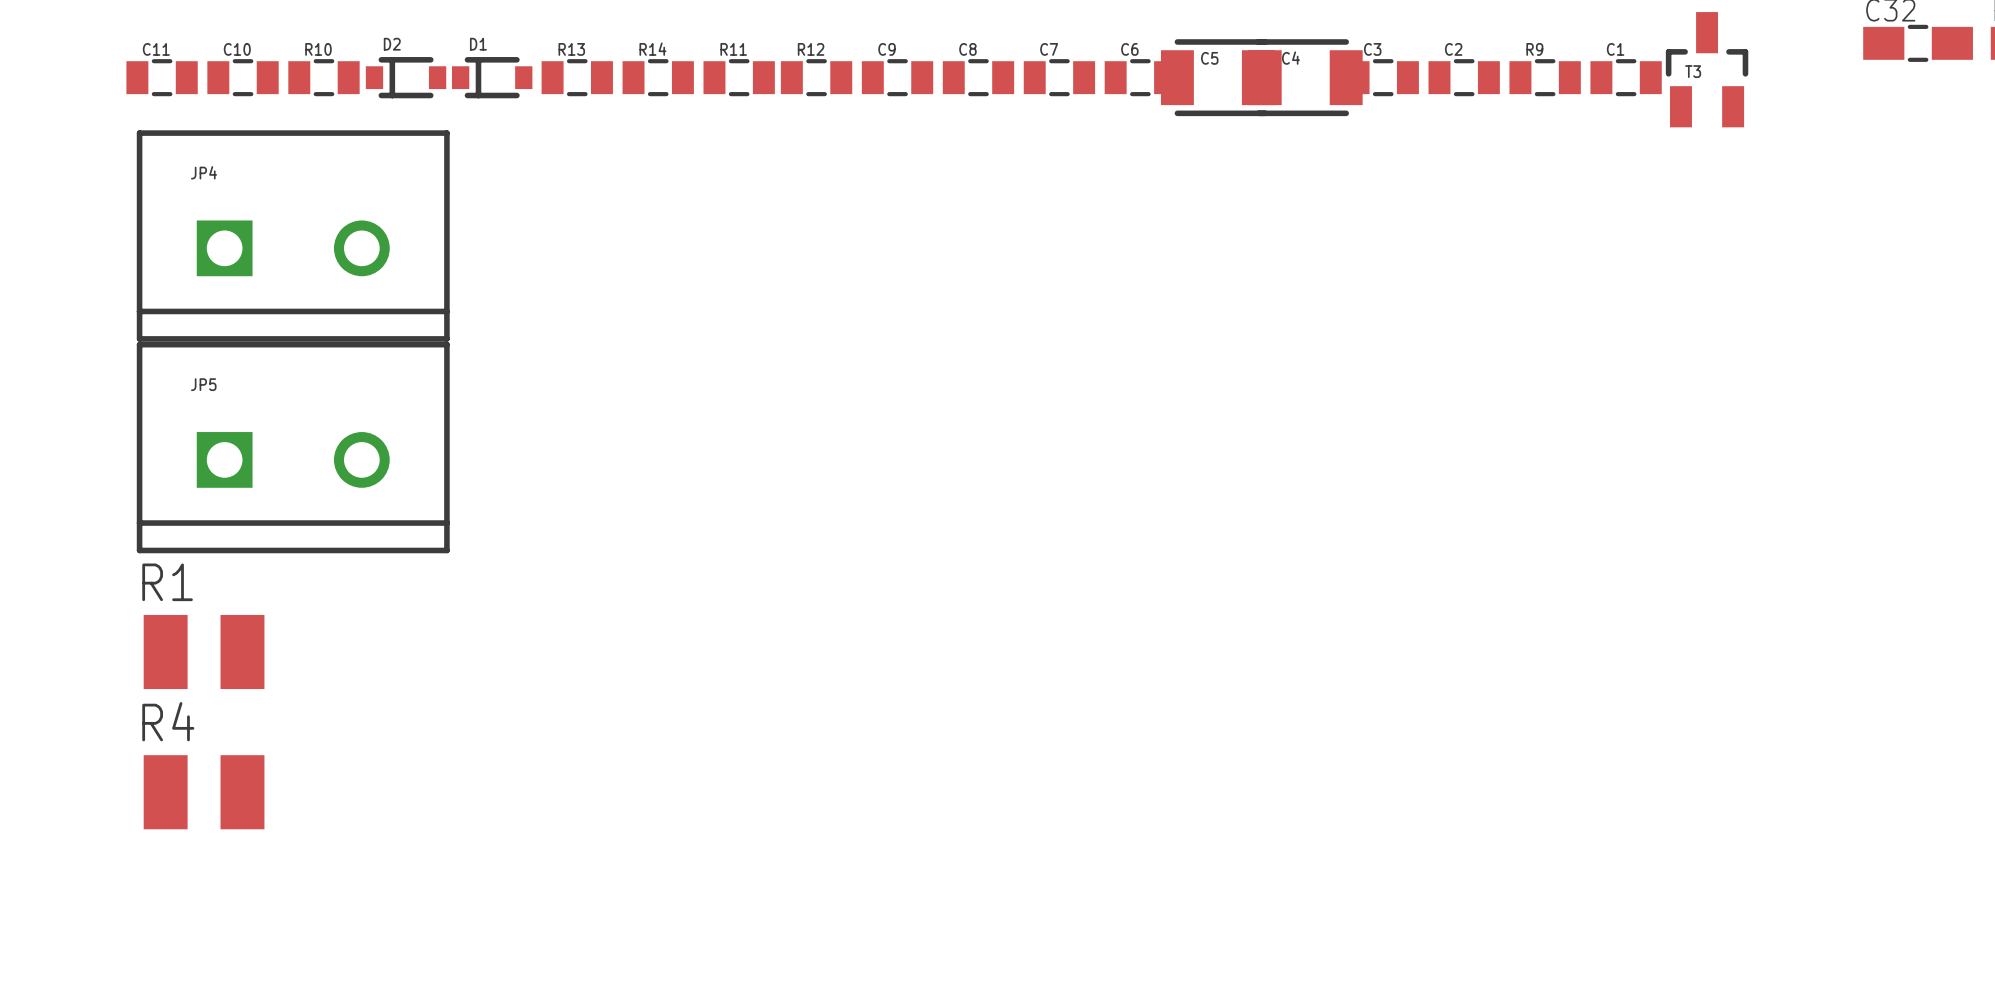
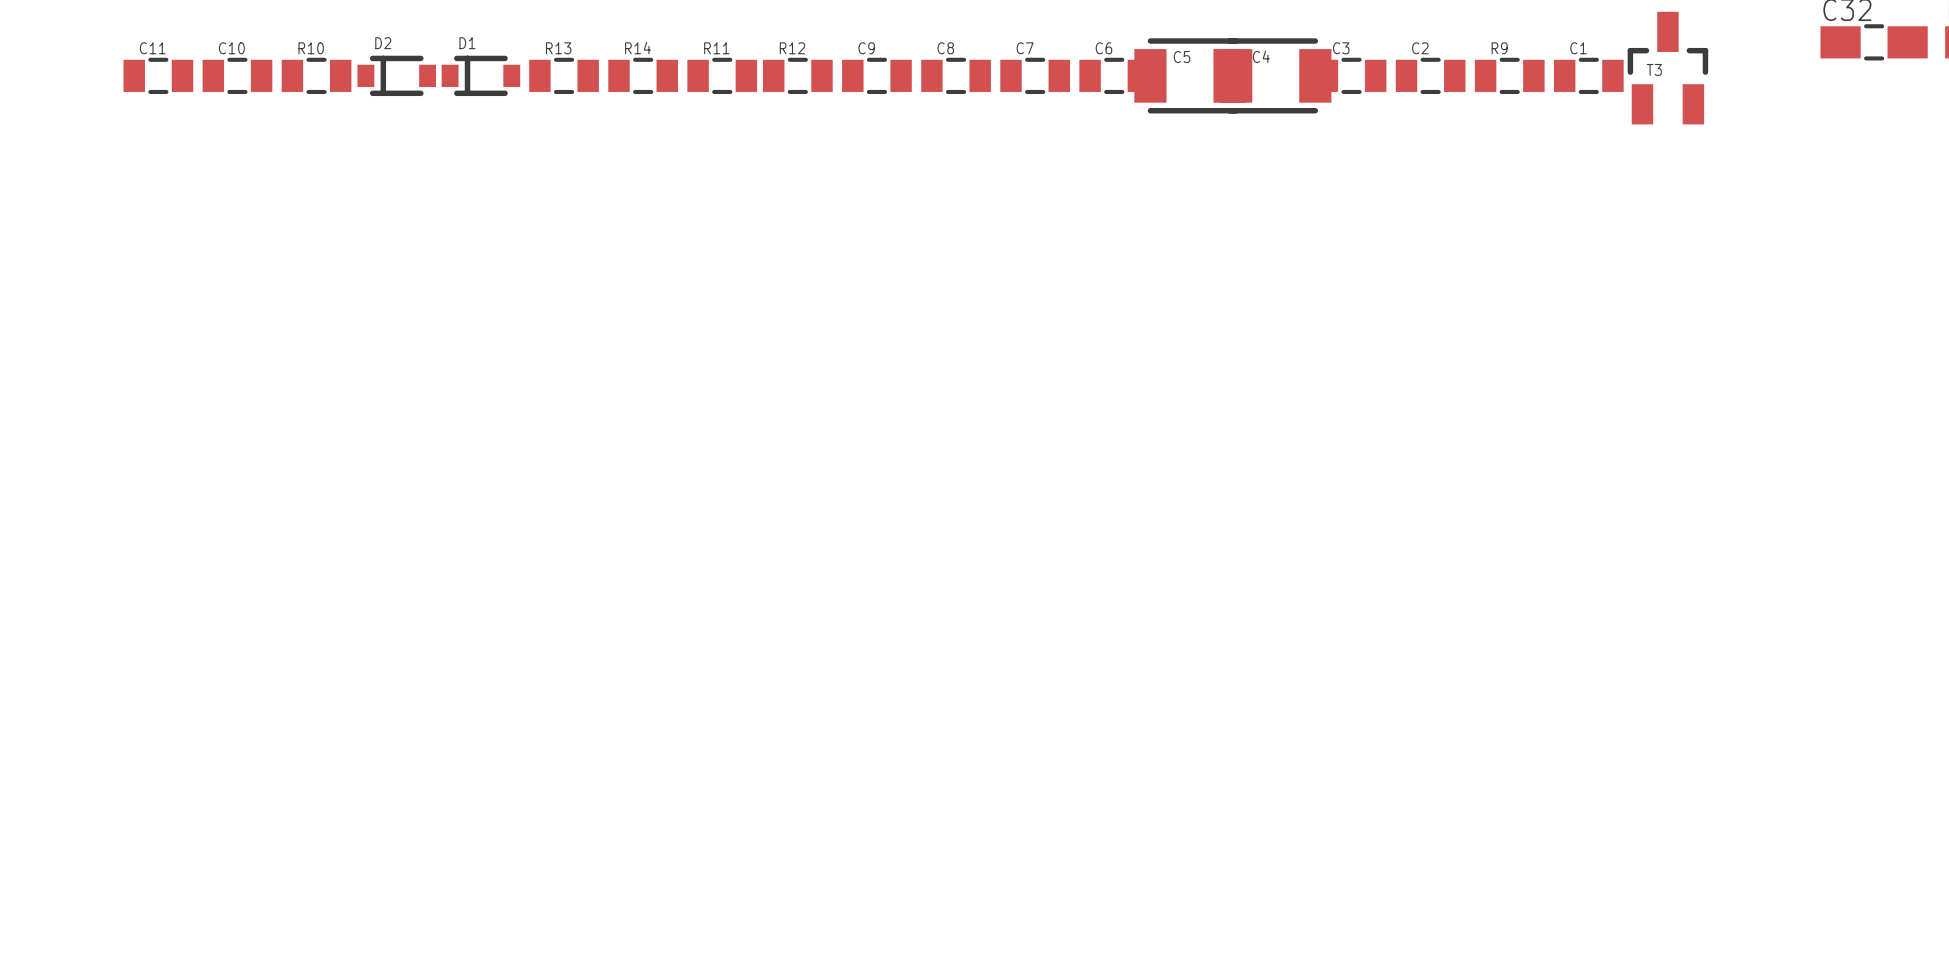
JP4: (293, 235) -> none
JP5: (293, 447) -> none
R1: (204, 652) -> none
R4: (204, 792) -> none

